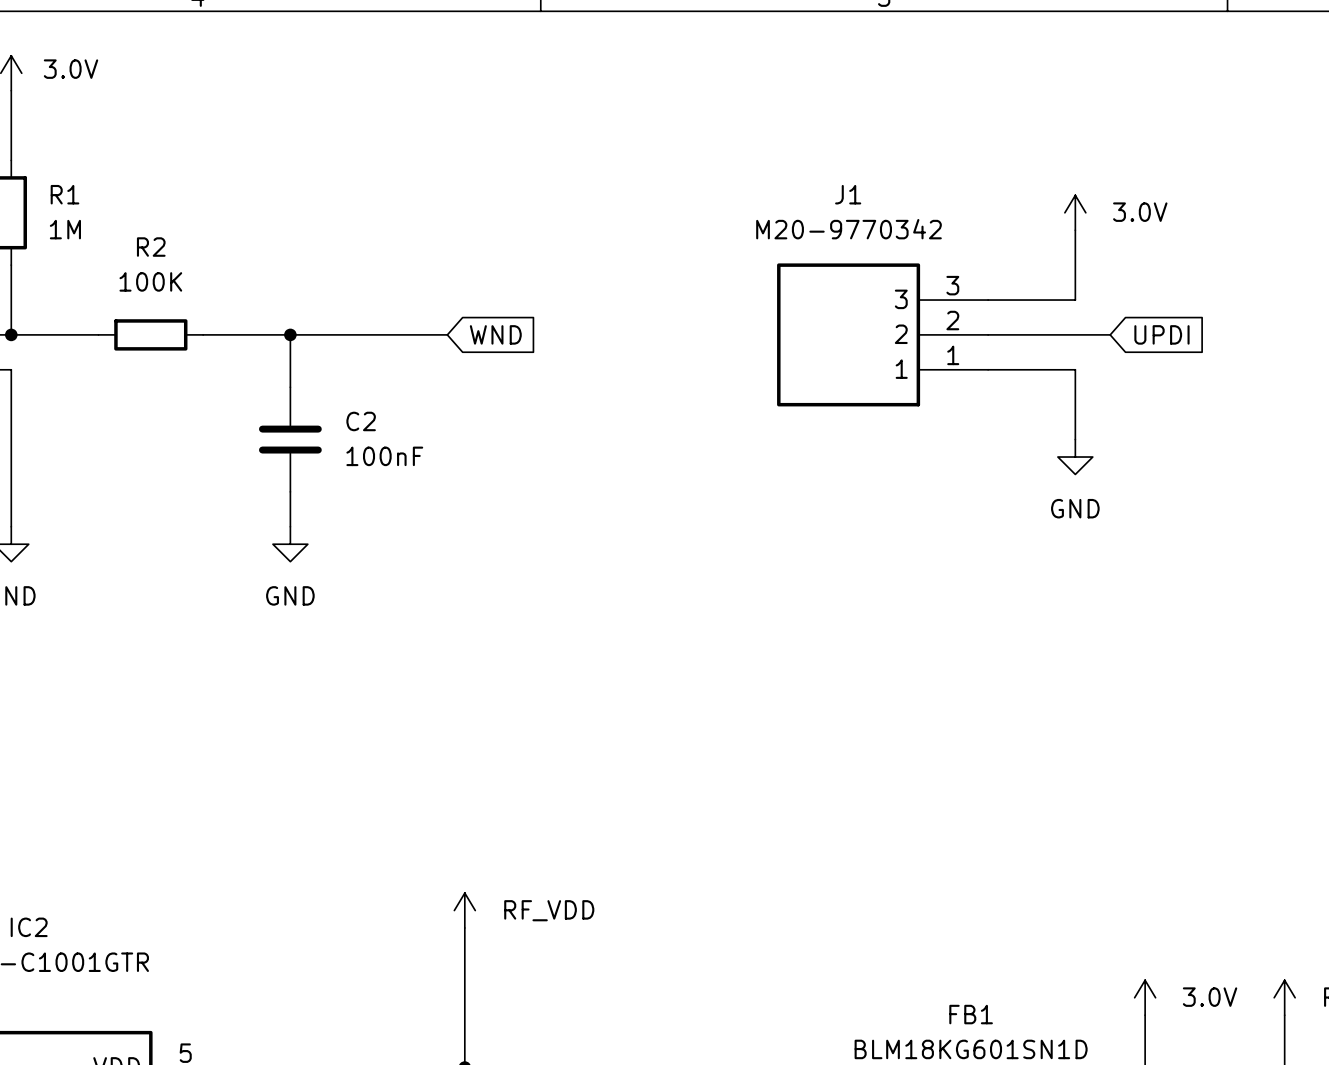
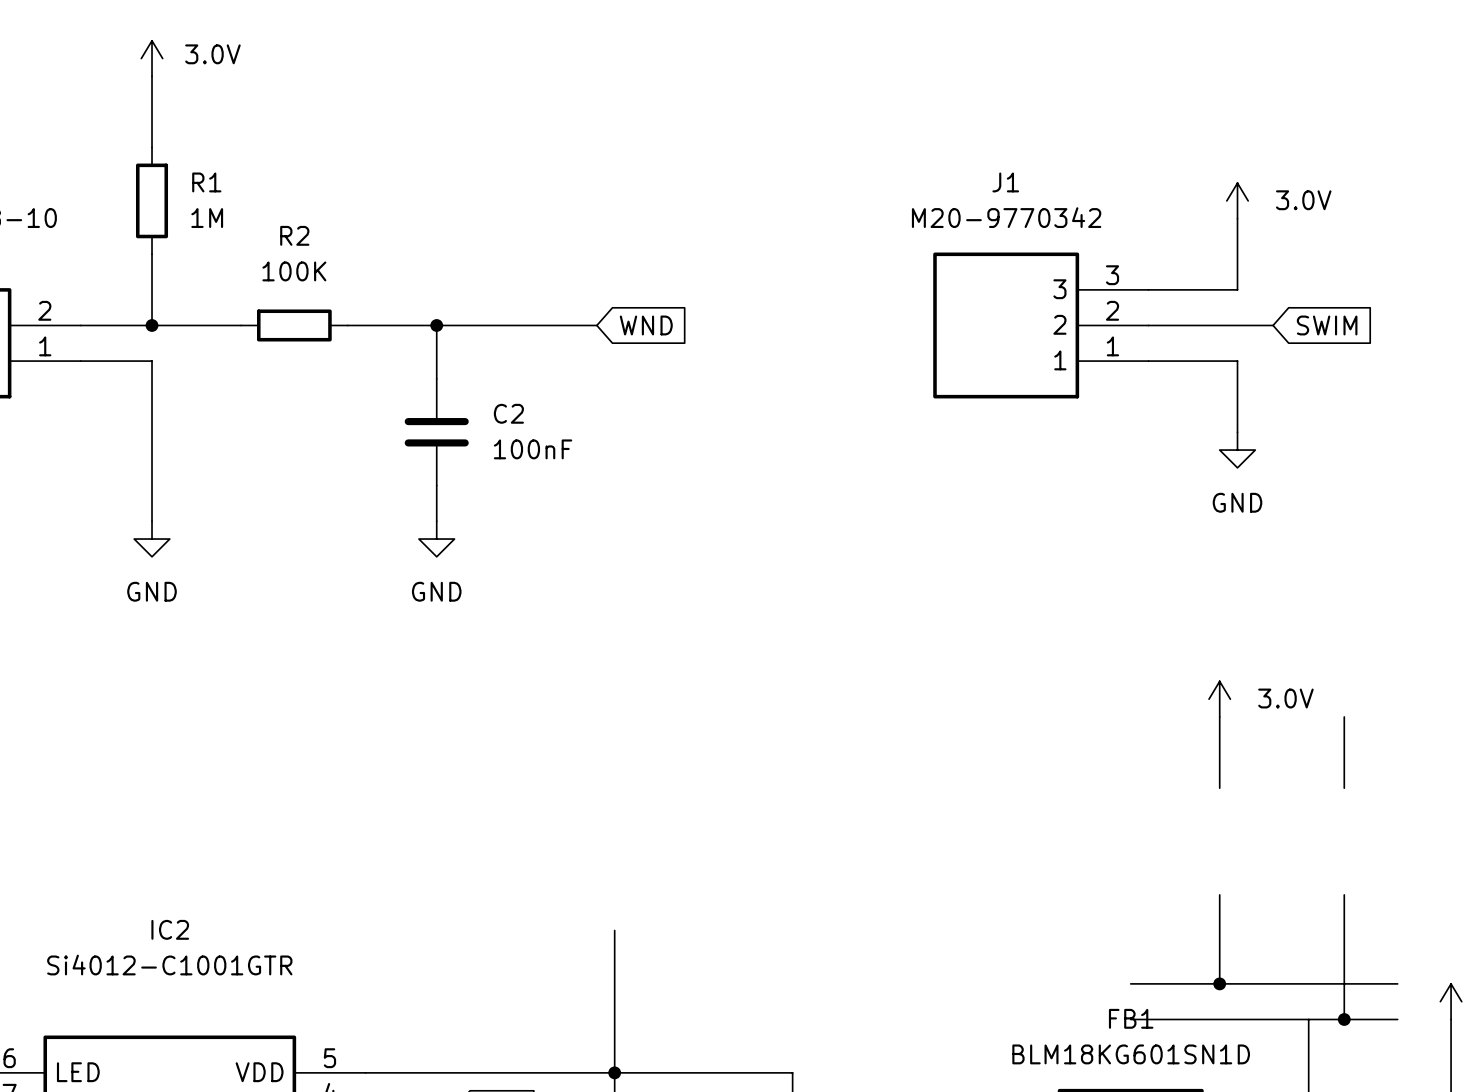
global label: UPDI (1161, 334) -> SWIM (1327, 325)
wire: none -> (1219, 716) (1219, 788)
wire: none -> (1344, 716) (1344, 788)
wire: none -> (1219, 894) (1219, 983)
wire: none -> (1344, 894) (1344, 1019)
power symbol: RF_VDD (464, 910) -> none
wire: none -> (1130, 983) (1397, 983)
junction: none -> (1219, 983)
power symbol position: 3.0V (1145, 997) -> 3.0V (1219, 699)
wire: none -> (1130, 1019) (1397, 1019)
junction: none -> (1344, 1019)

